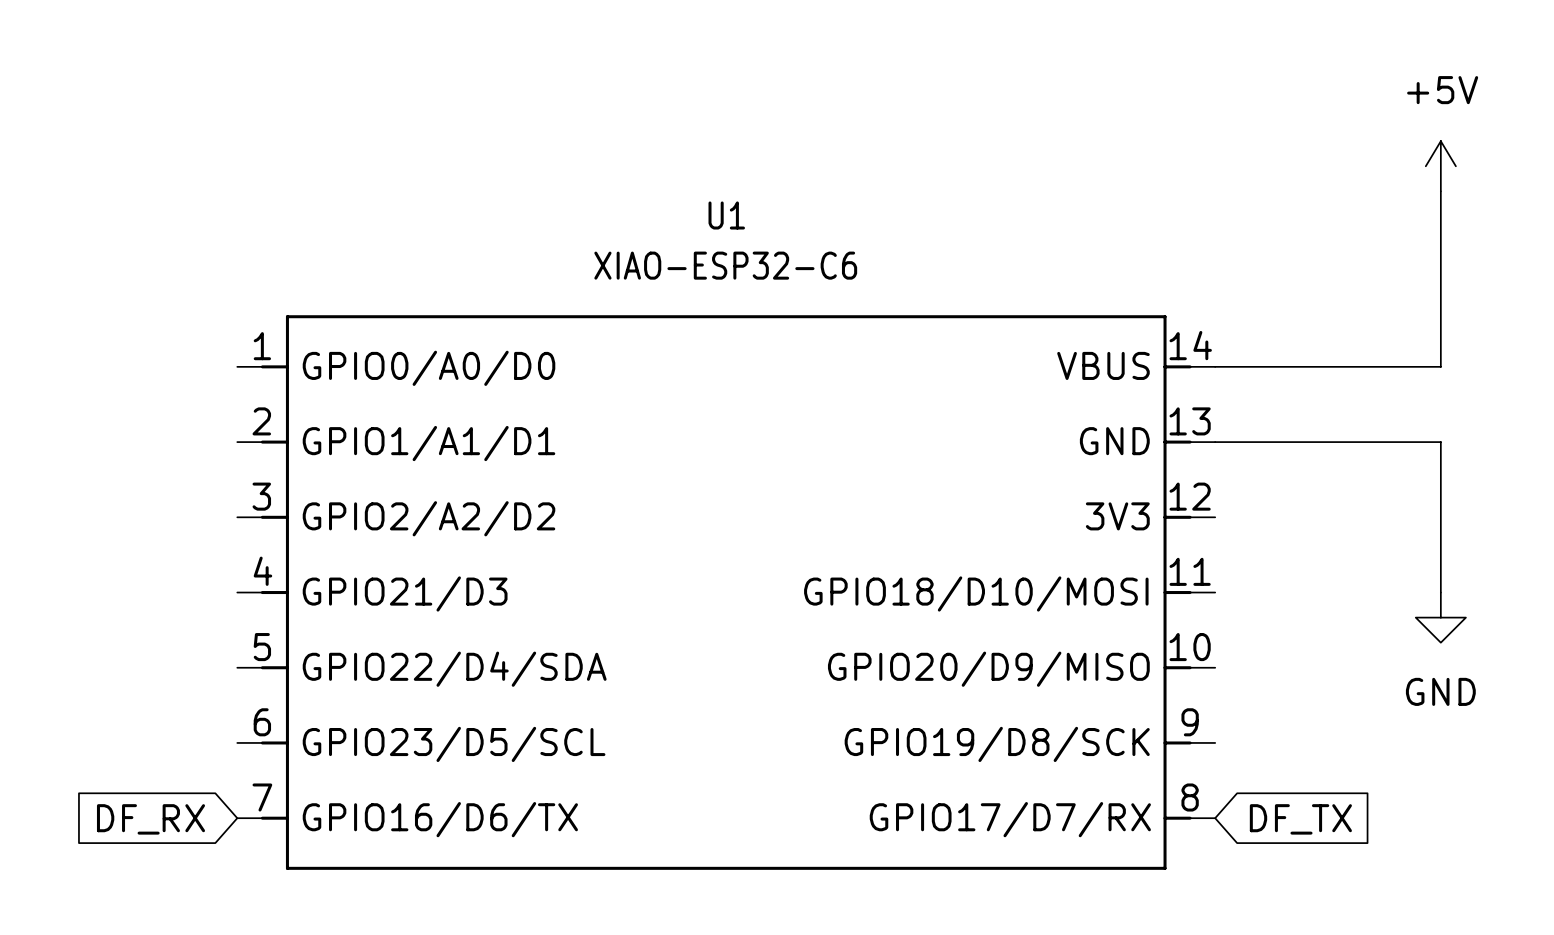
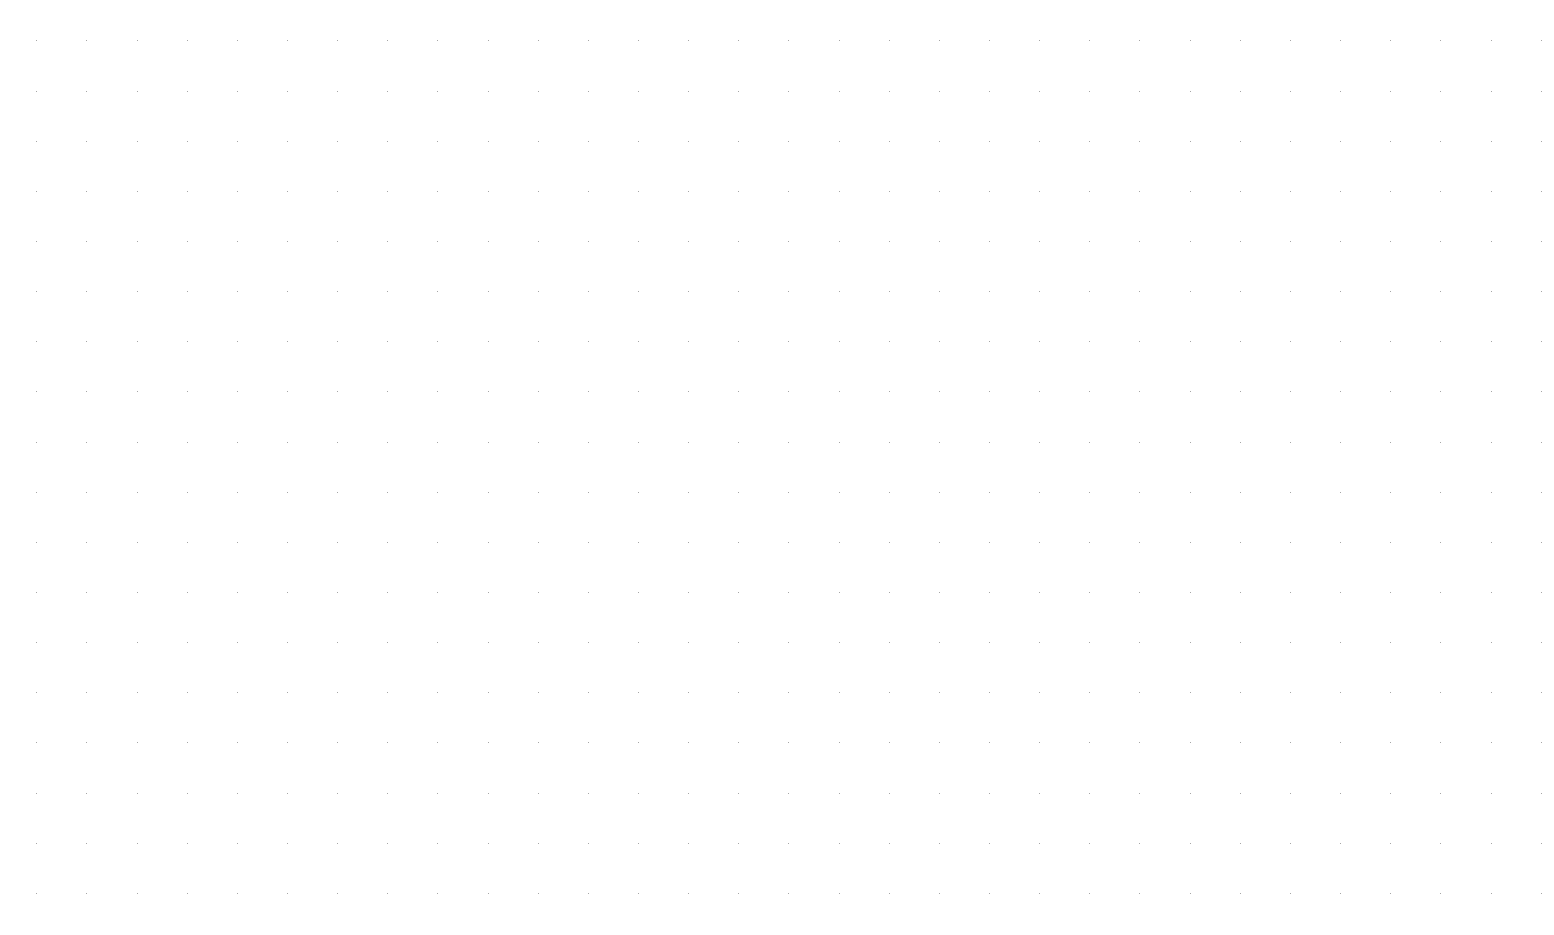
power symbol: +5V (1440, 166) -> none
wire: (1440, 191) (1440, 366) (1215, 366) -> none
wire: (1215, 442) (1440, 442) (1440, 592) -> none
U1: XIAO-ESP32-C6 (726, 592) -> none
power symbol: GND (1440, 617) -> none
global label: DF_RX (151, 819) -> none
global label: DF_TX (1300, 819) -> none

